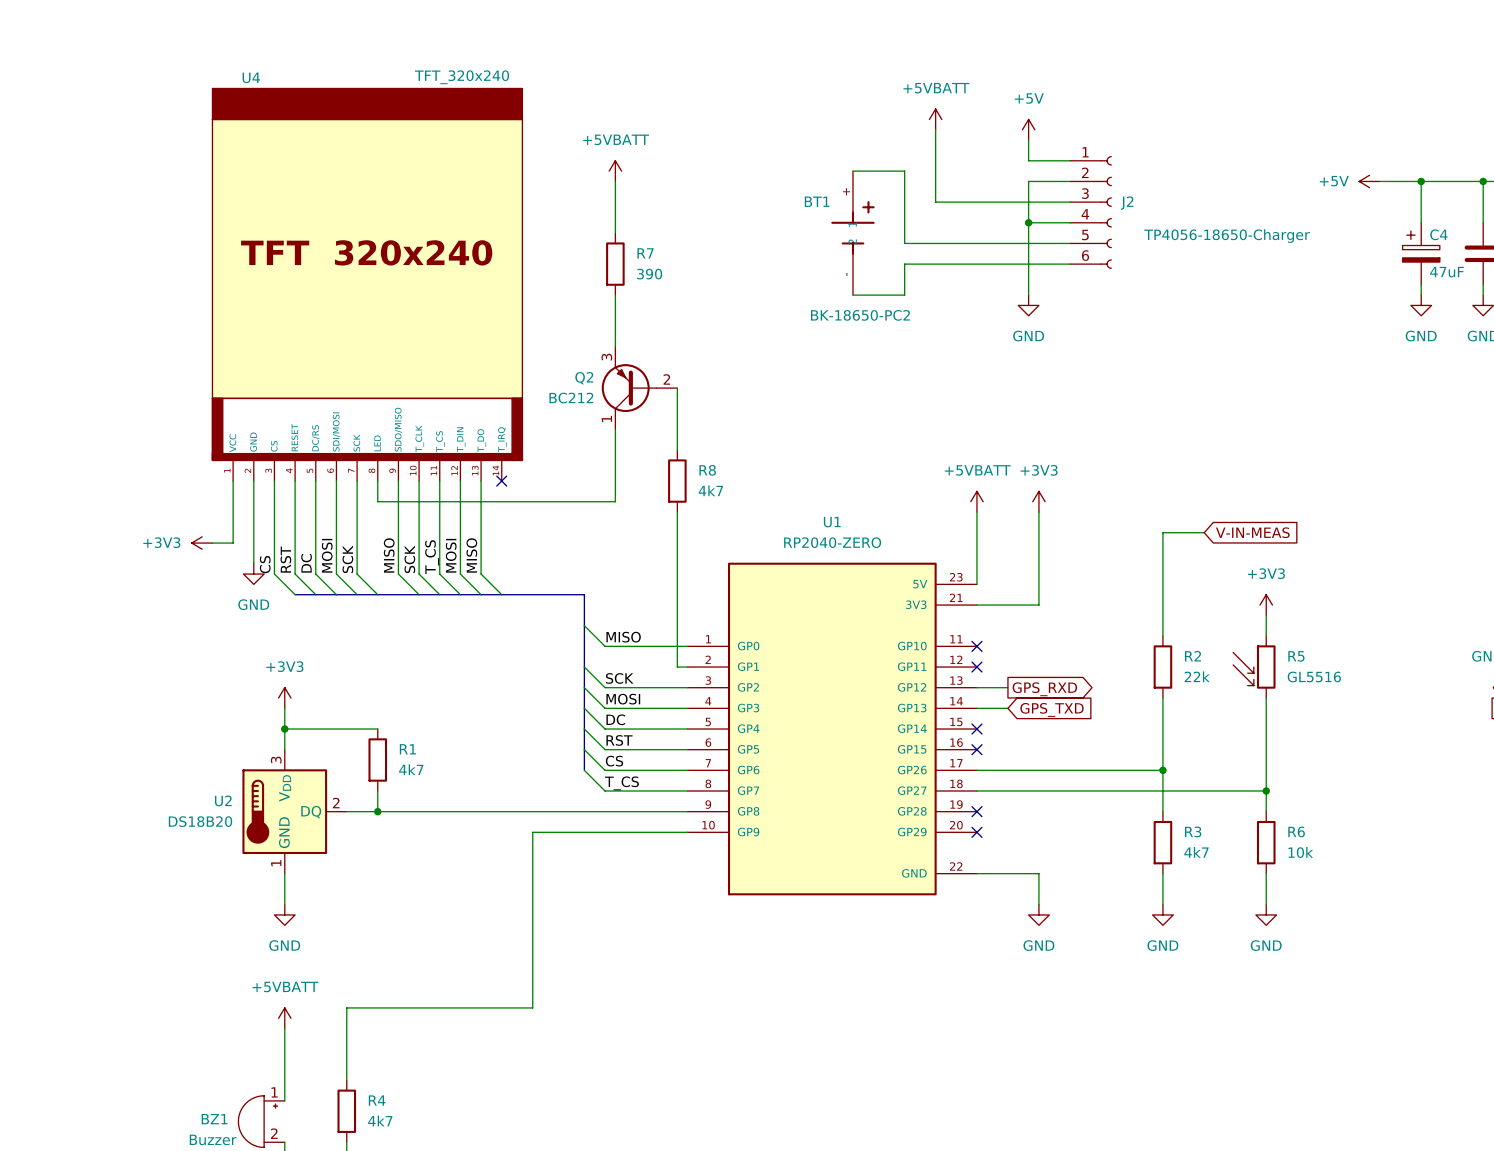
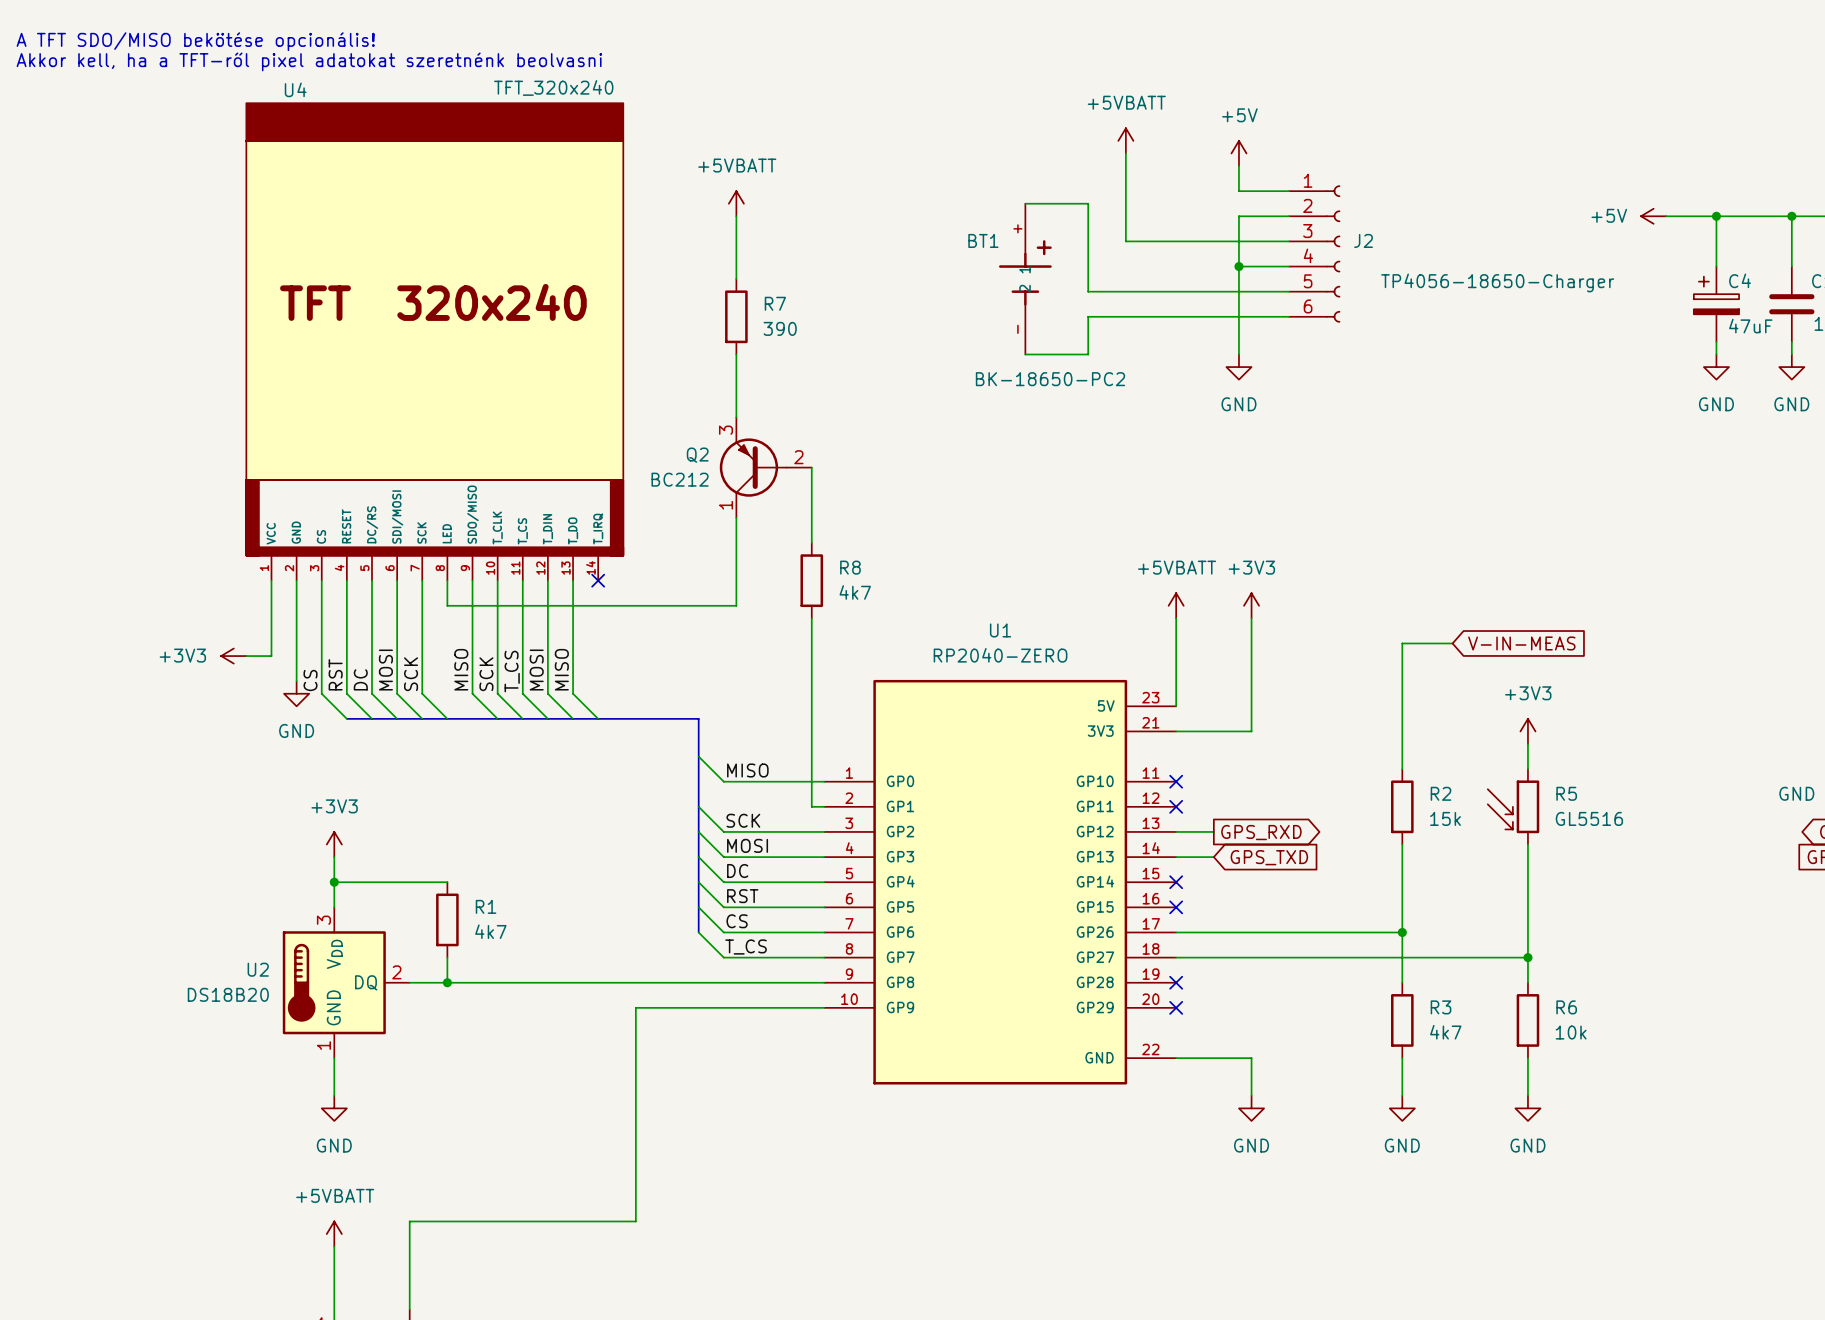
text: none -> A TFT SDO/MISO bekötése opcionális! (195, 41)
text: none -> Akkor kell, ha a TFT-ről pixel adatokat szeretnénk beolvasni (309, 61)
R2 value: 22k (1197, 676) -> 15k (1445, 818)

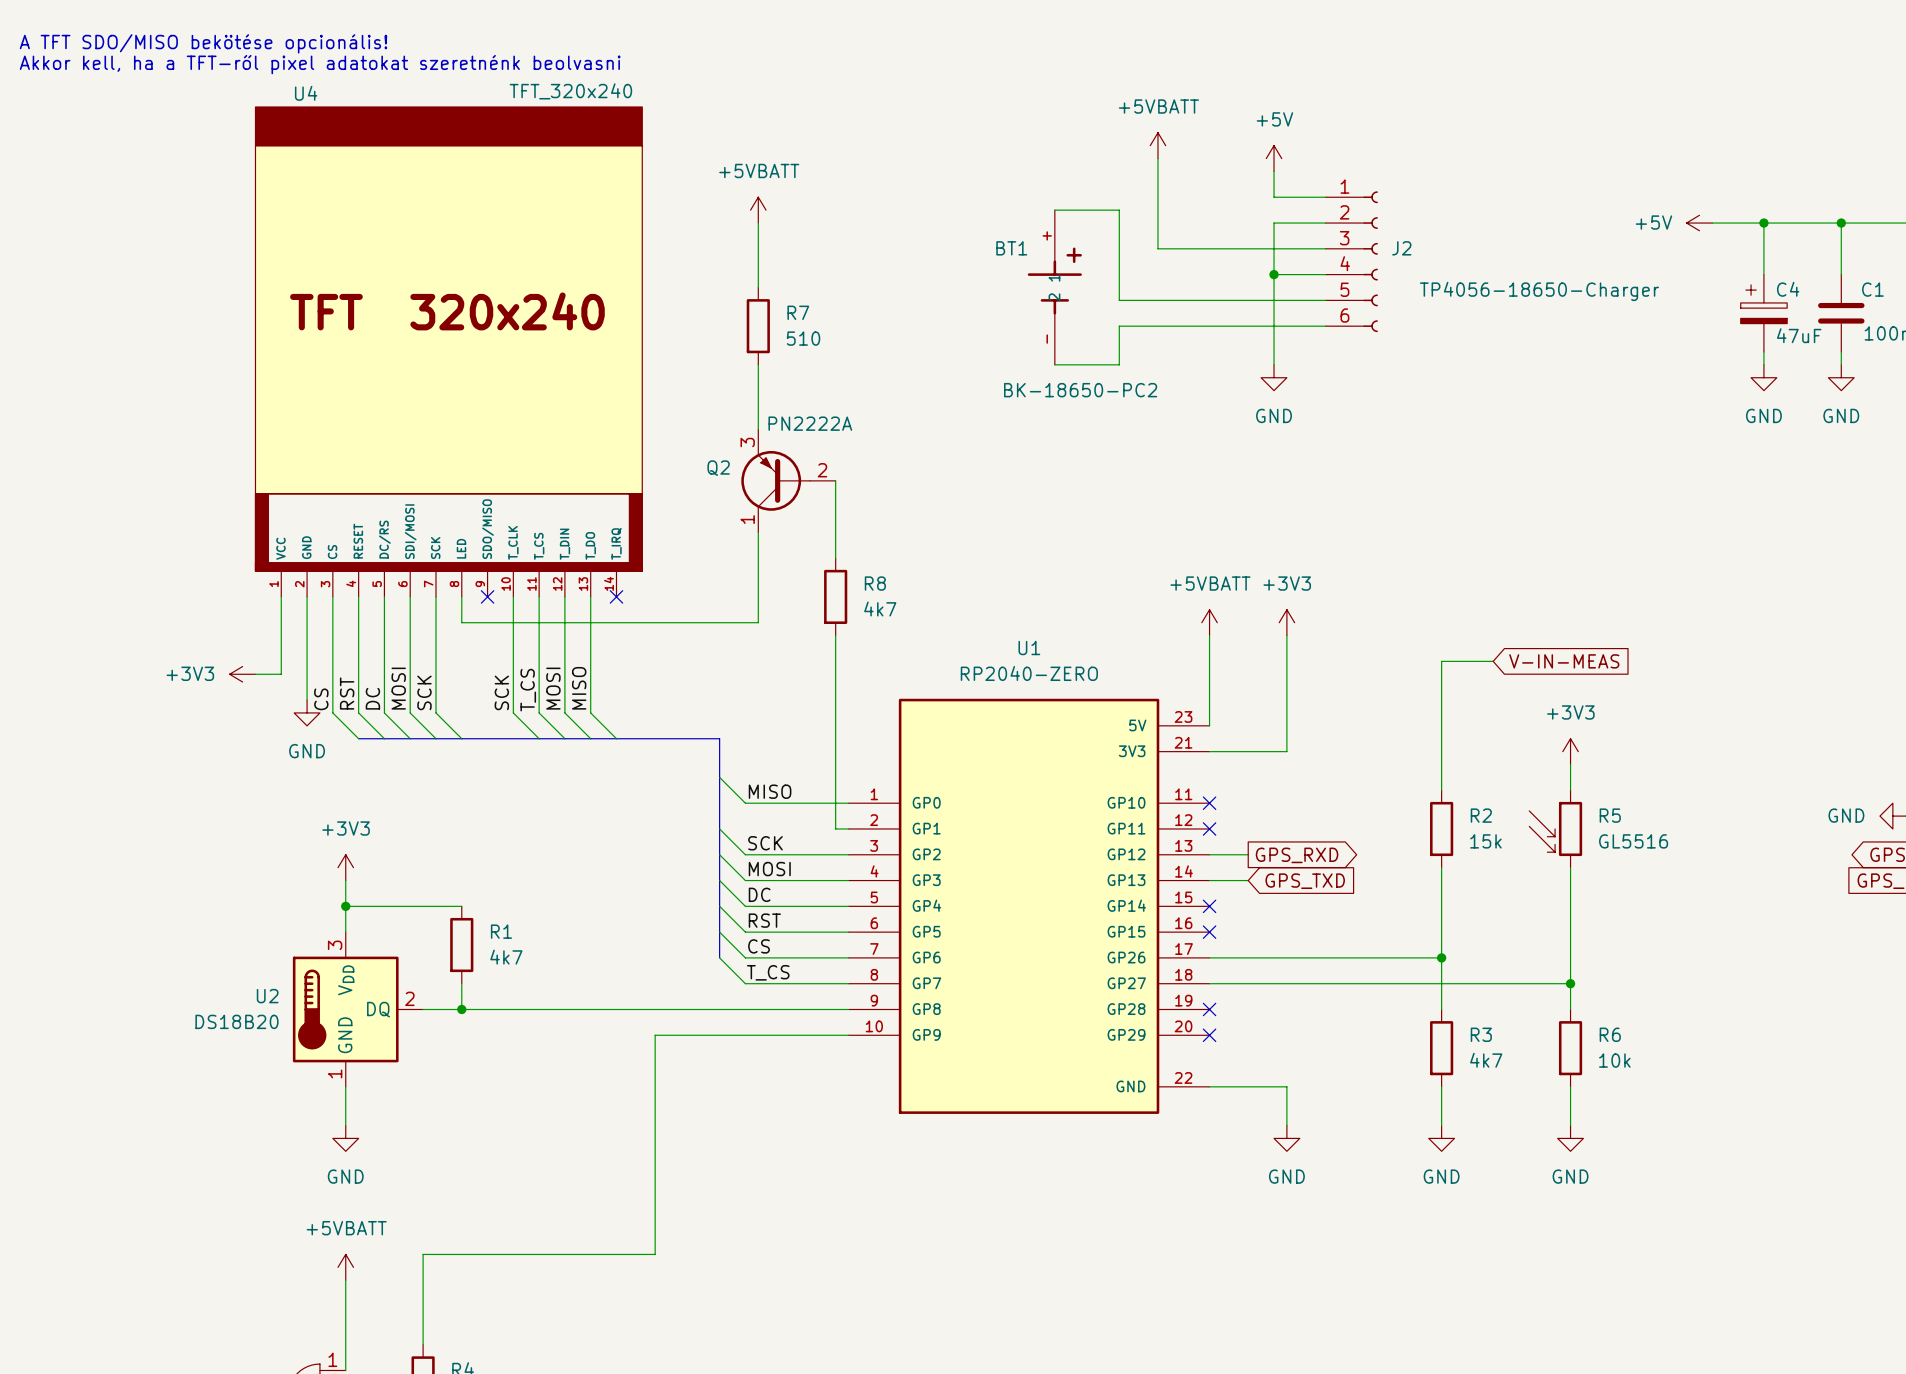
R7 value: 390 (780, 328) -> 510 (803, 338)
Q2 value: BC212 (680, 479) -> PN2222A (810, 423)
wire: (472, 580) (472, 693) (497, 718) -> none
no-connect mark: none -> (487, 596)
label: MISO (461, 669) -> none

